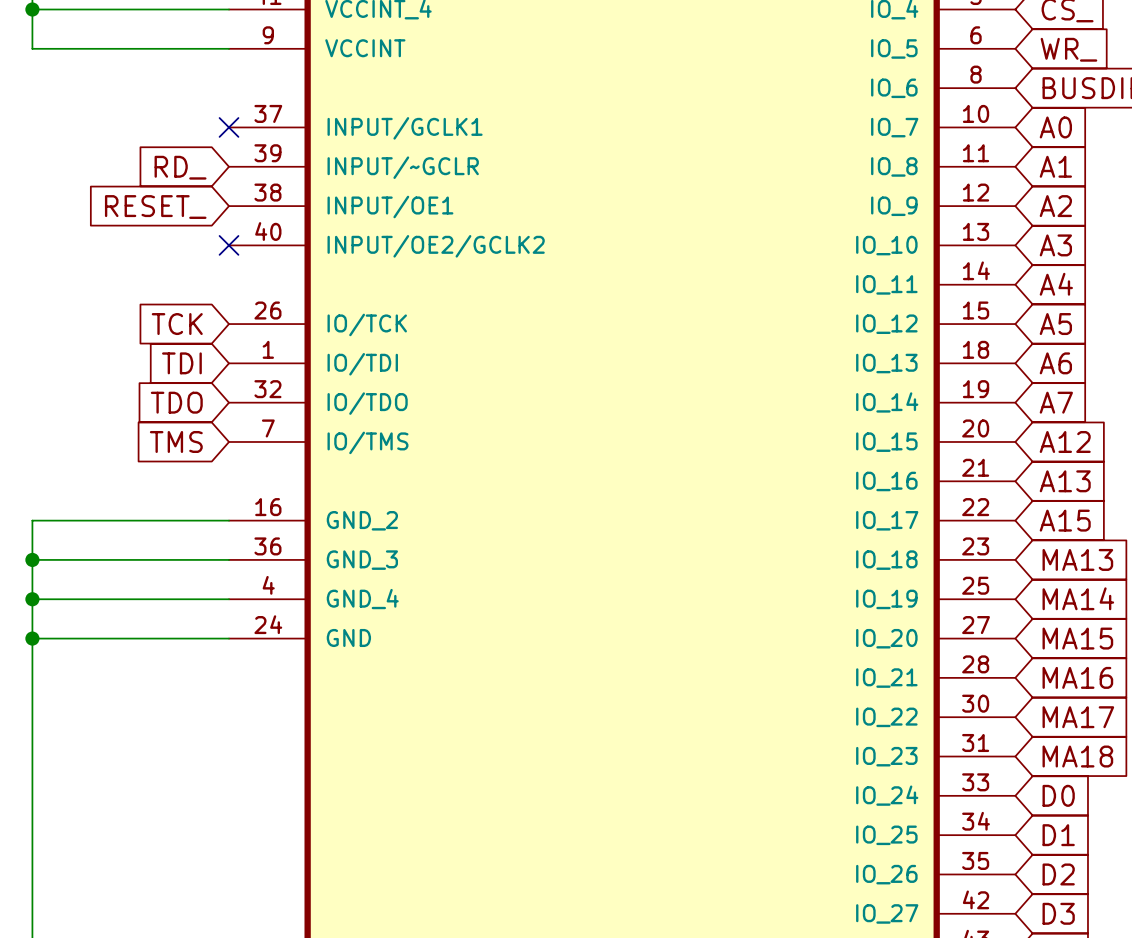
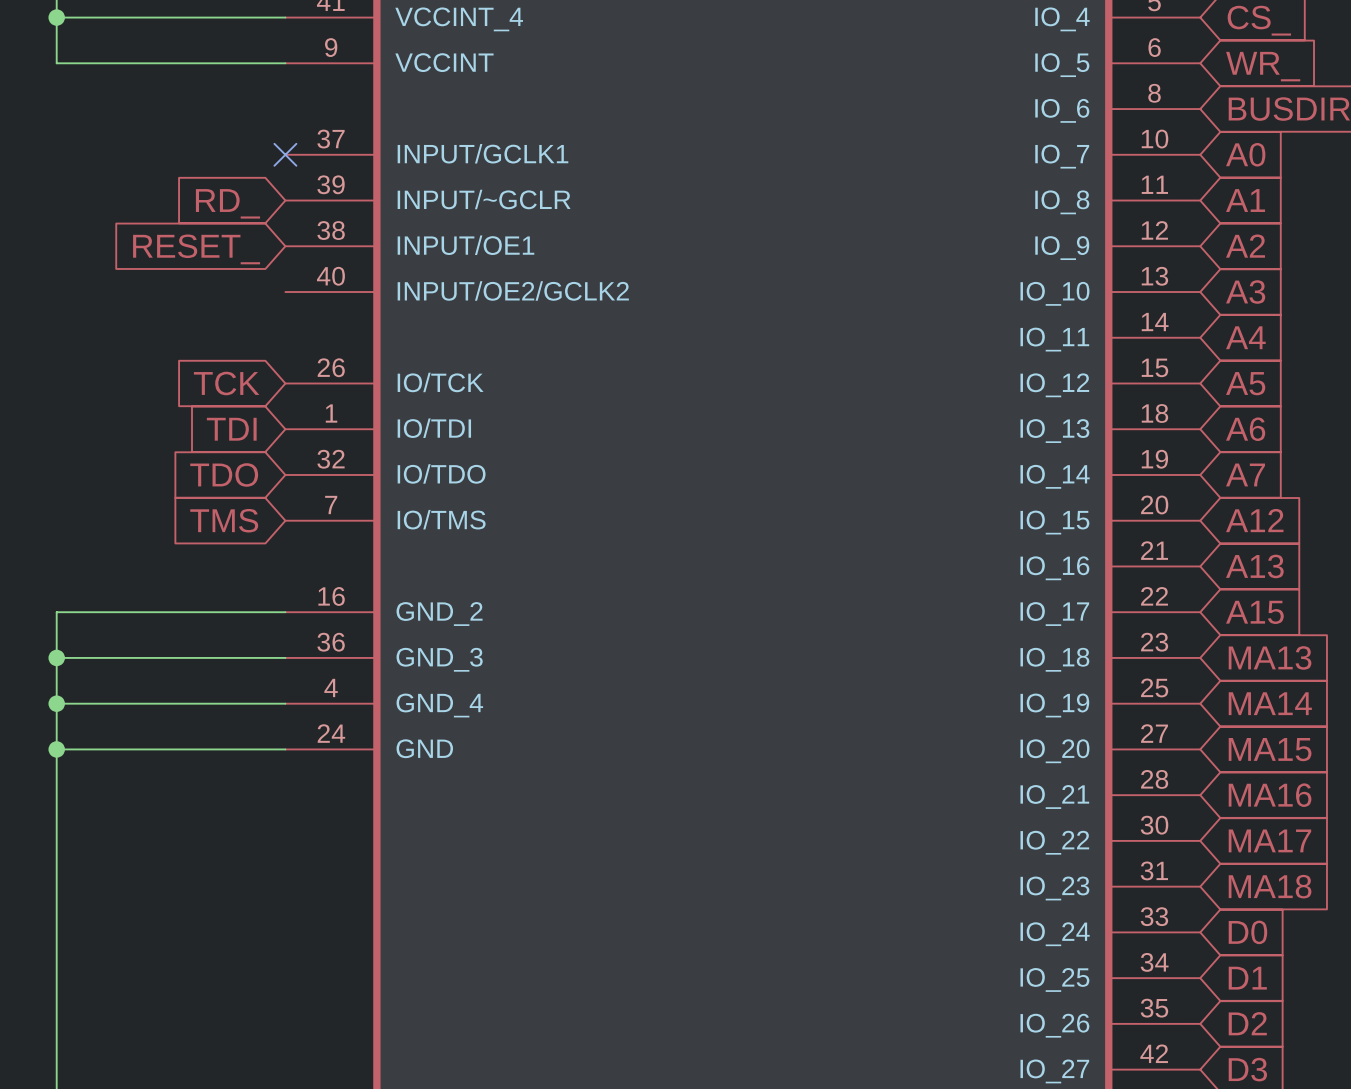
no-connect mark: (229, 245) -> none

